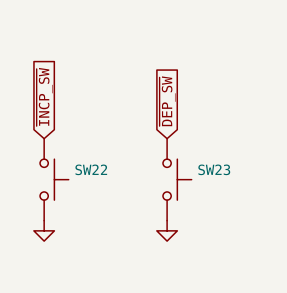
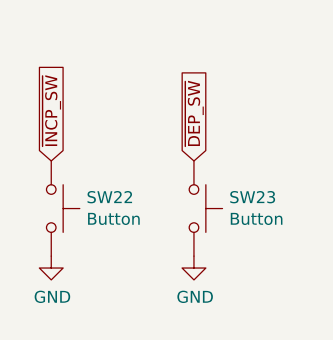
SW22 value: none -> Button (113, 218)
SW23 value: none -> Button (256, 218)
power symbol text: none -> GND (52, 296)
power symbol text: none -> GND (195, 296)

